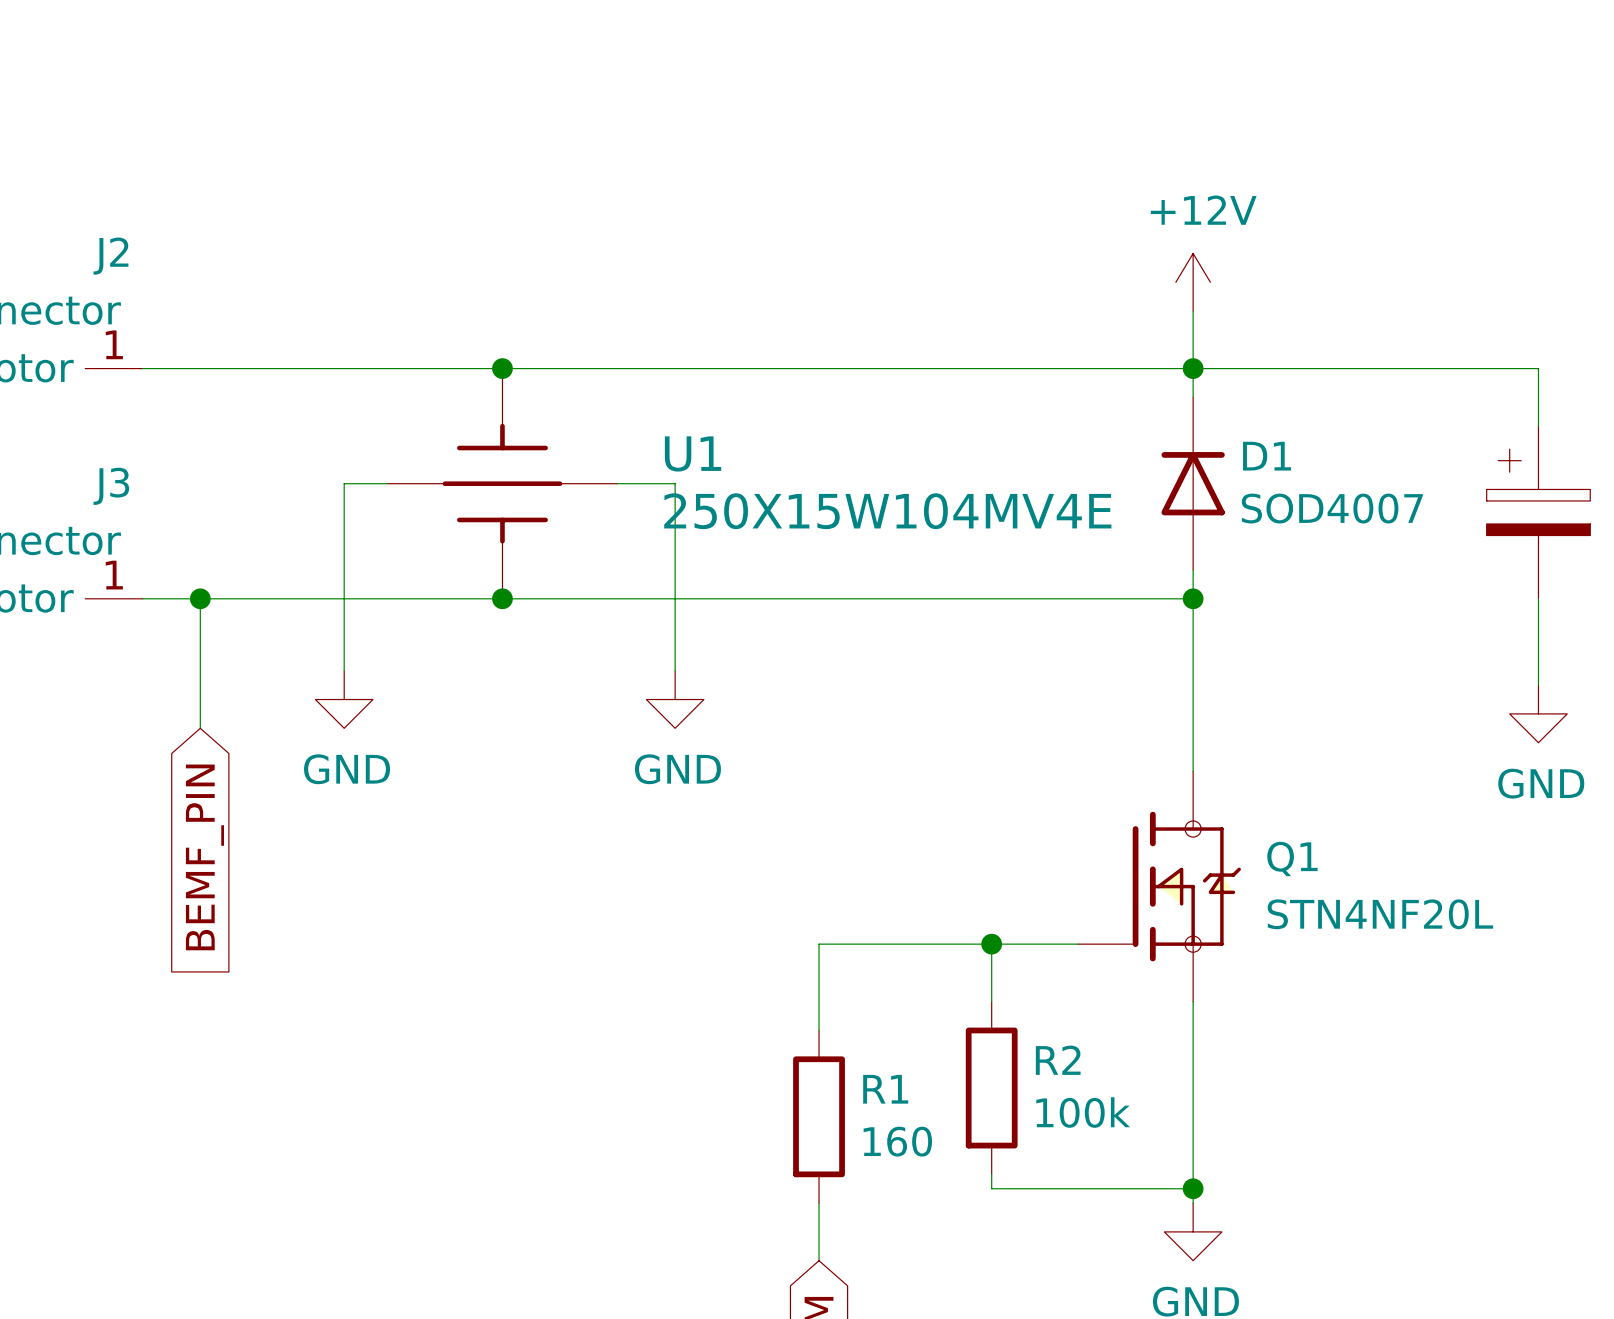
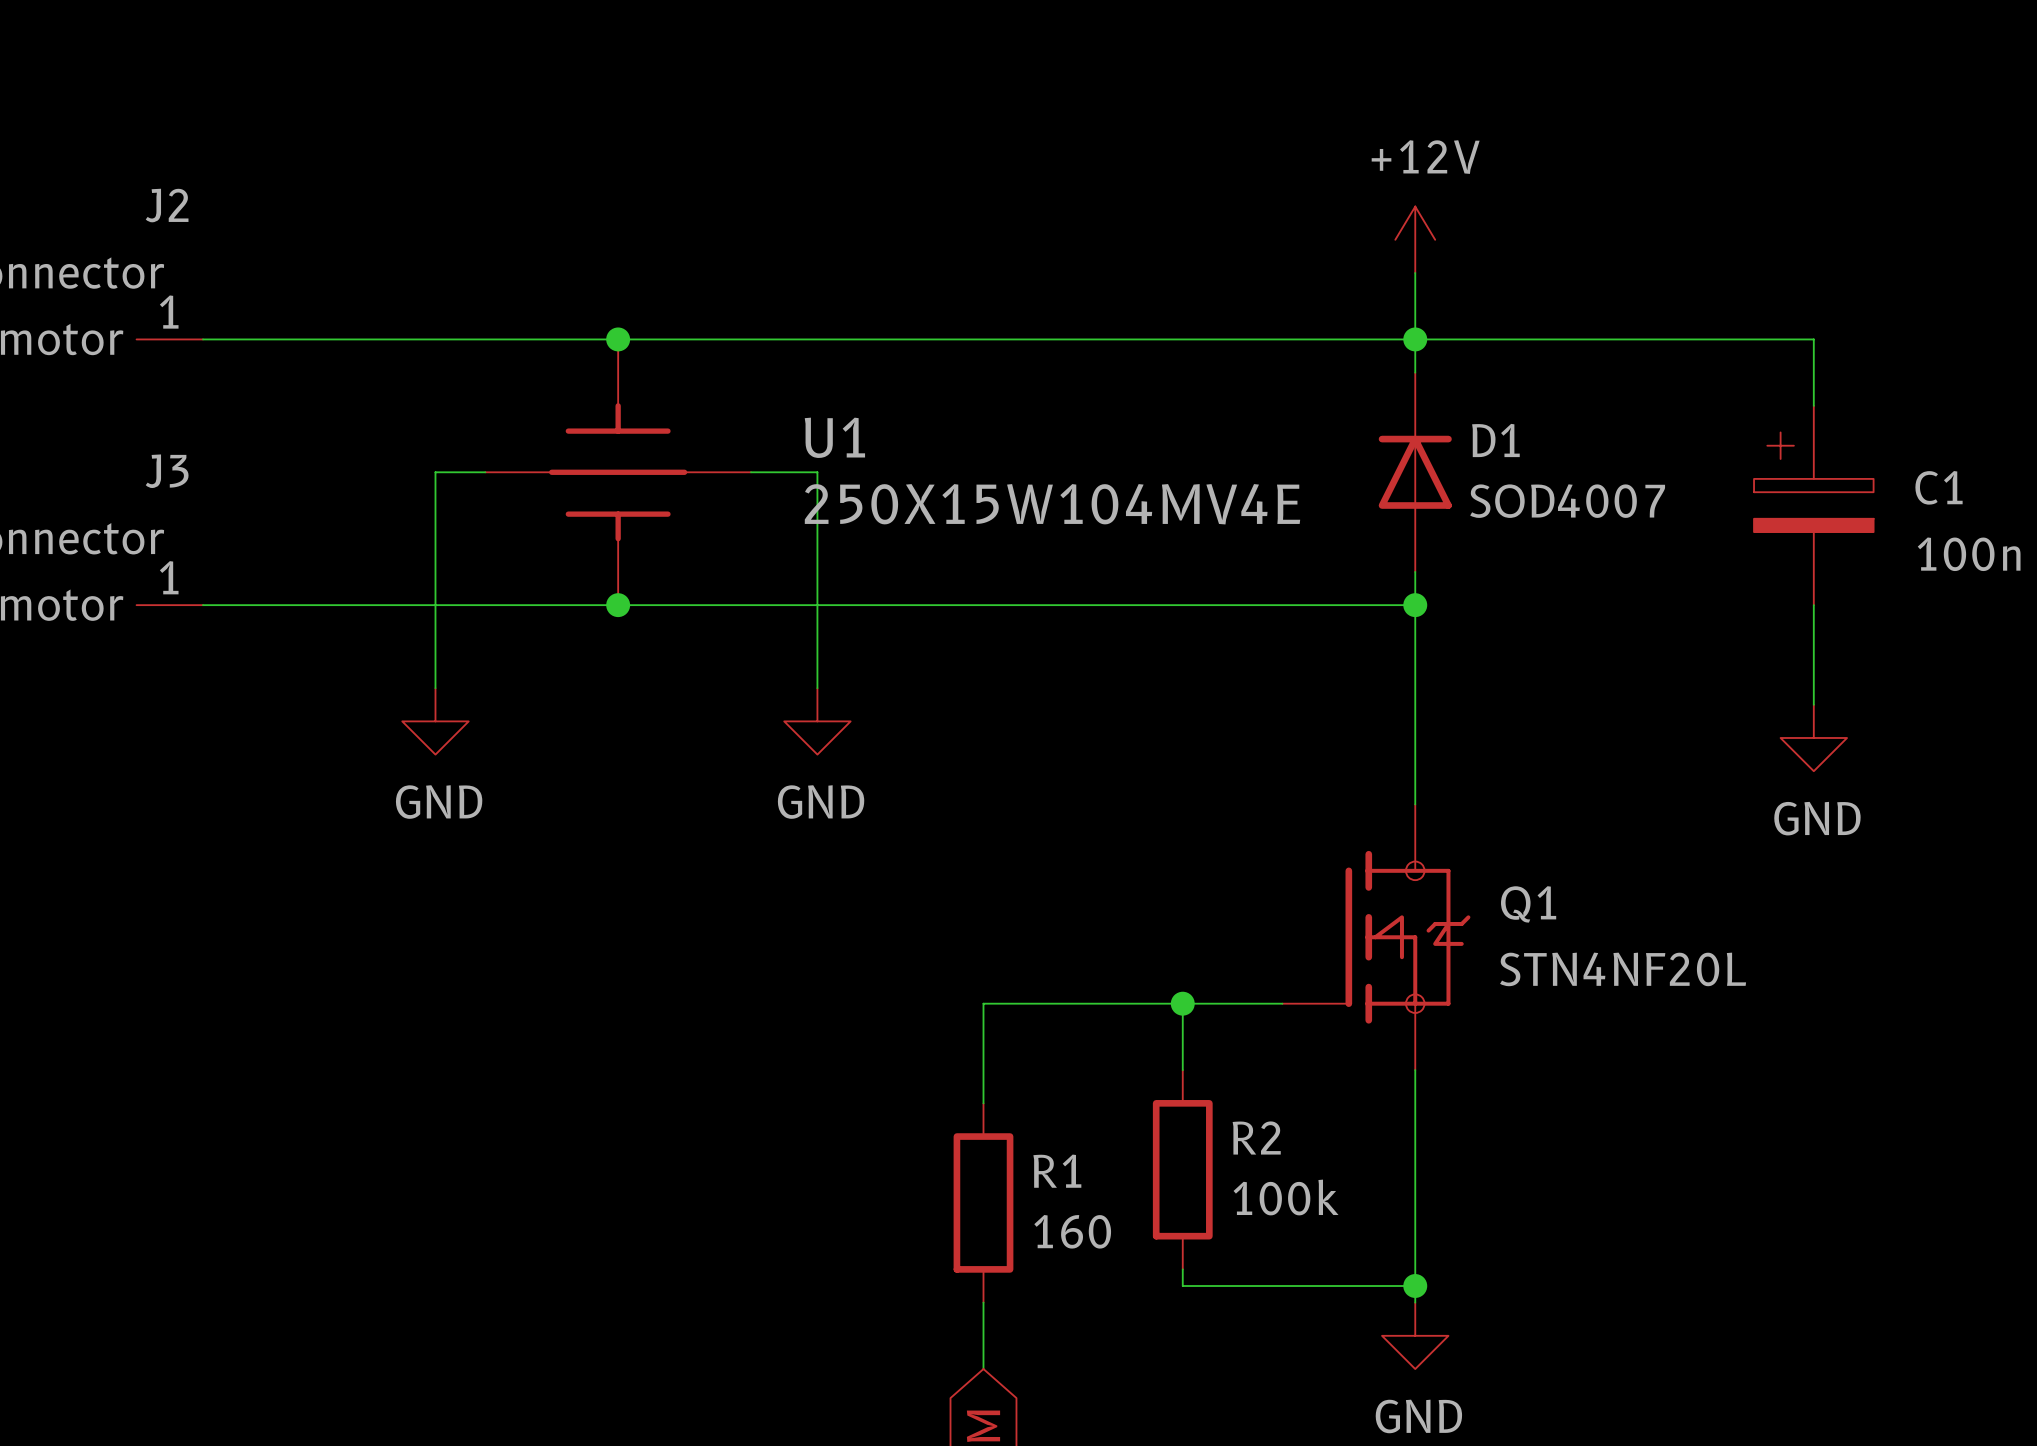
wire: (200, 598) (200, 728) -> none
junction: (200, 598) -> none
global label: BEMF_PIN (204, 857) -> none

